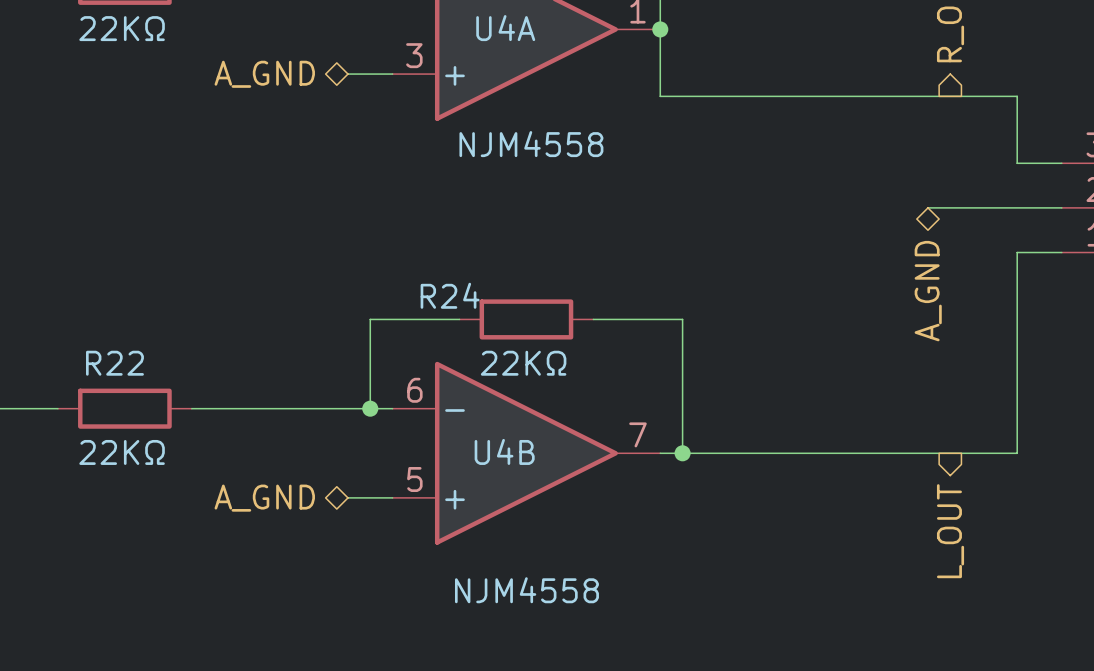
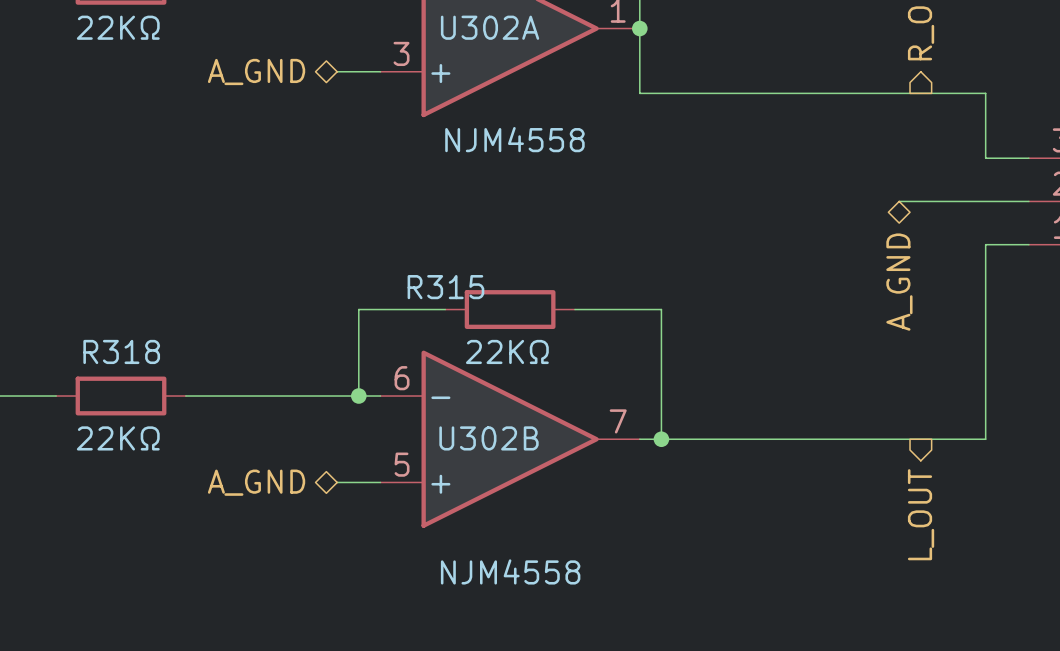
U4A name: U4A (505, 28) -> U302A (490, 27)
R24 name: R24 (450, 295) -> R315 (445, 287)
R22 name: R22 (114, 363) -> R318 (121, 351)
U4B name: U4B (504, 451) -> U302B (489, 438)

